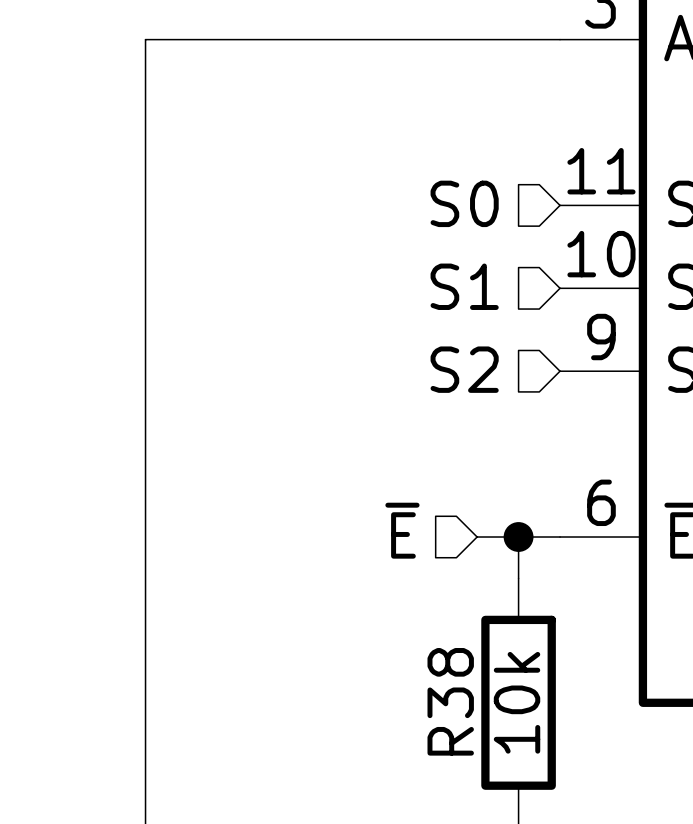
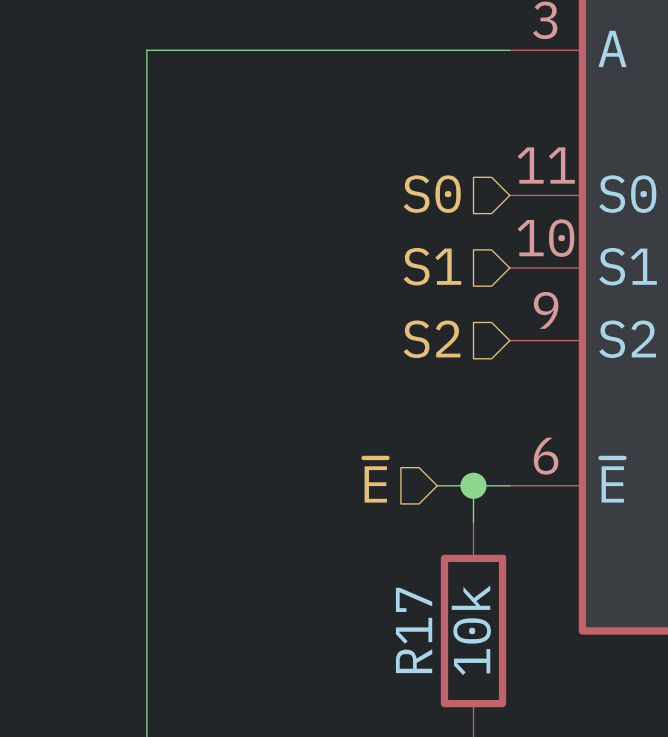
R38 name: R38 (450, 701) -> R17 (414, 630)

